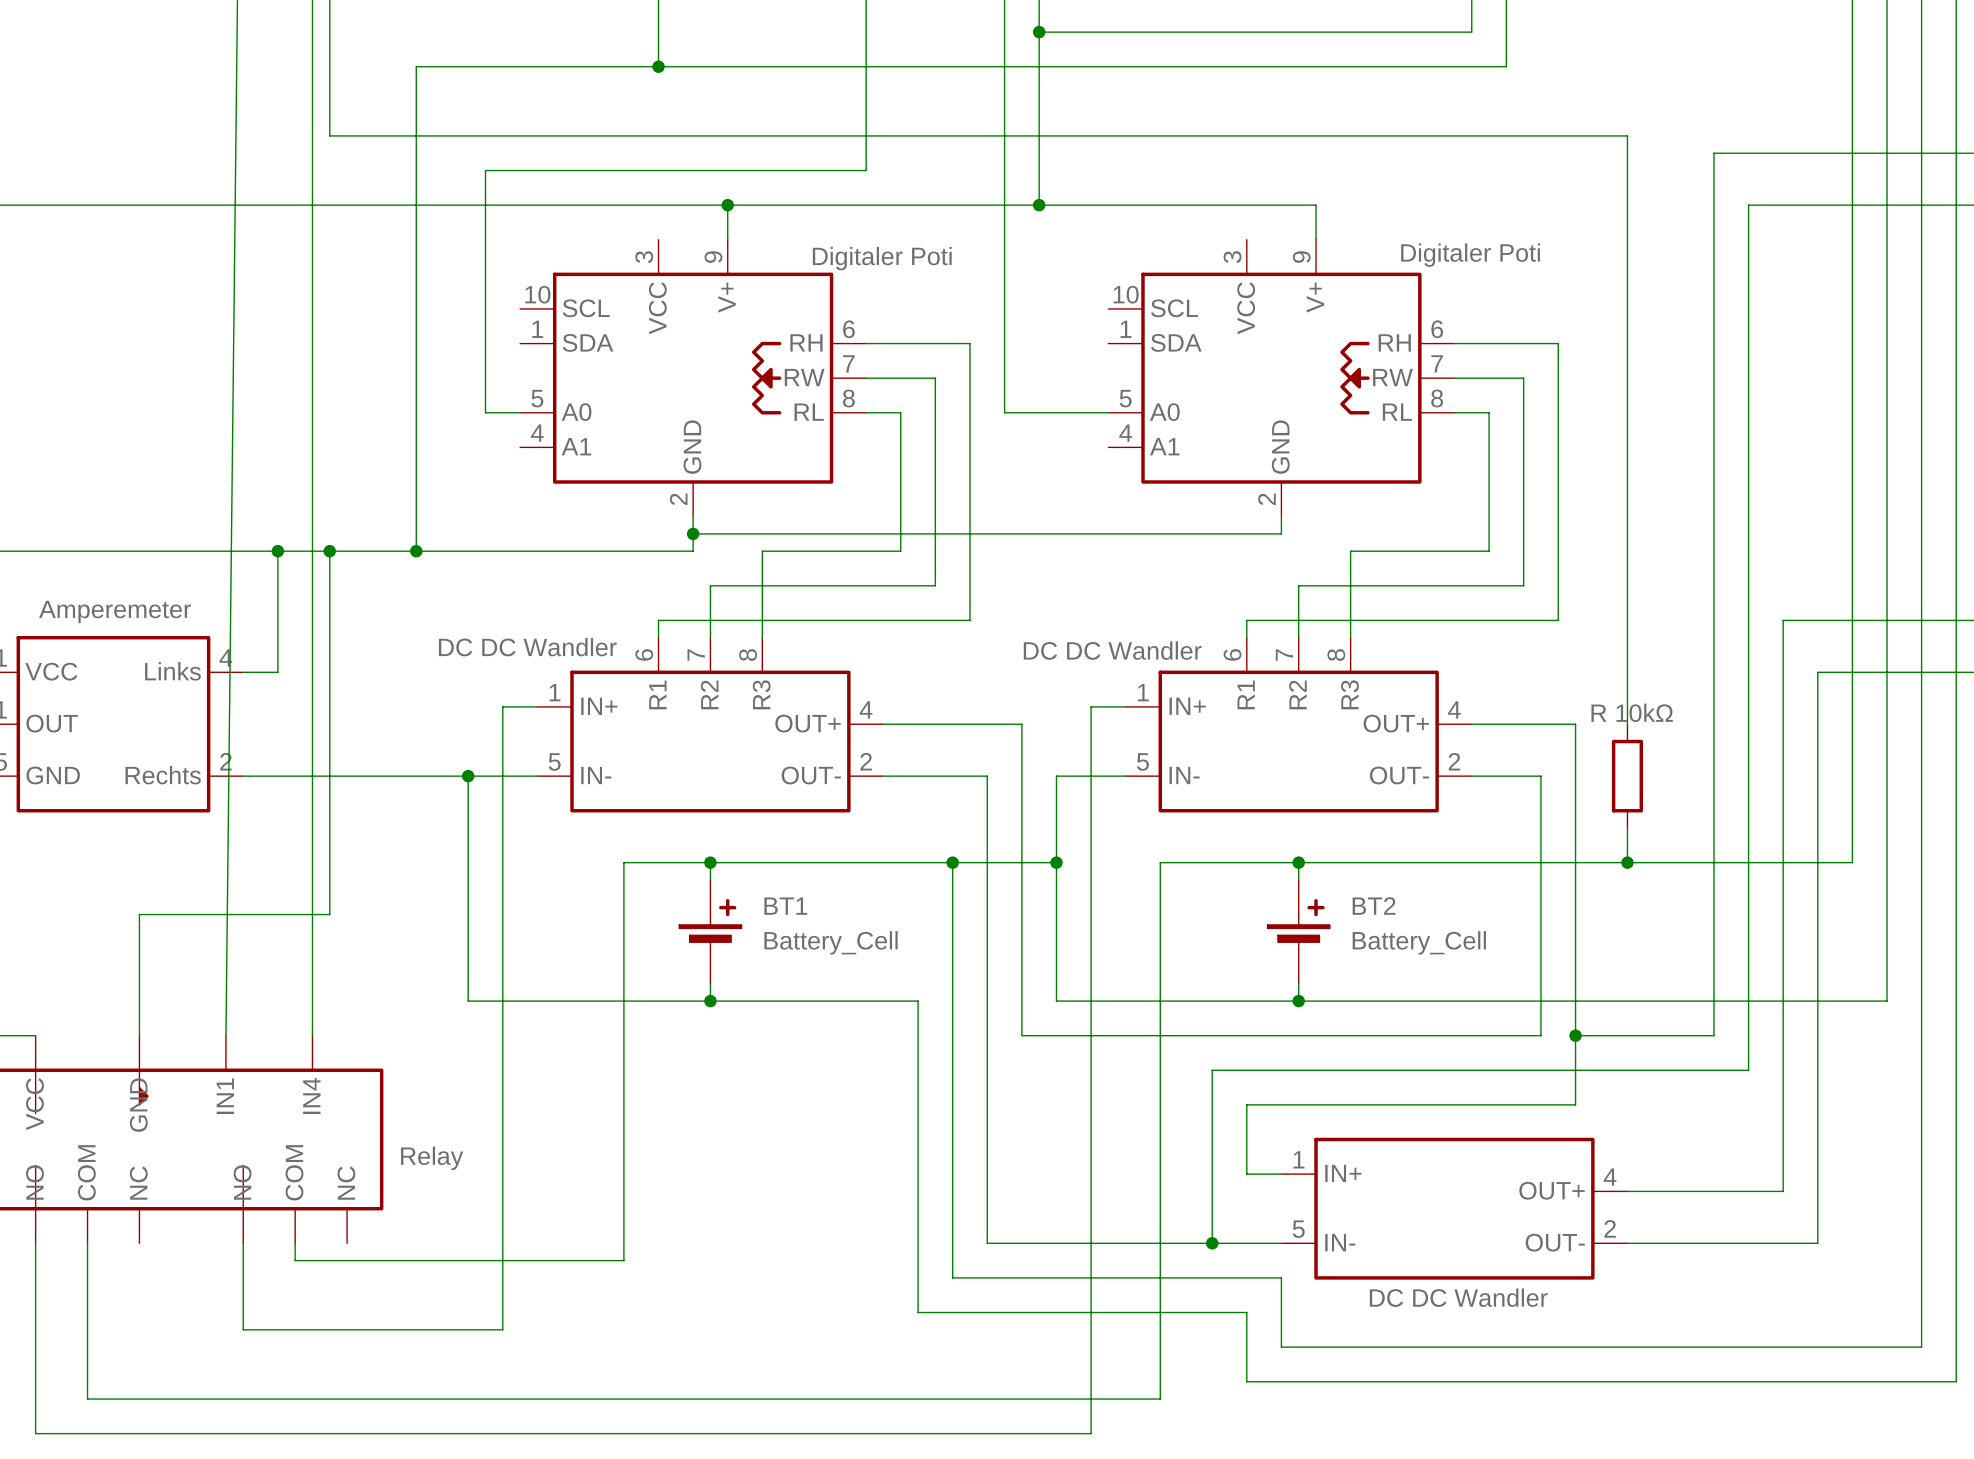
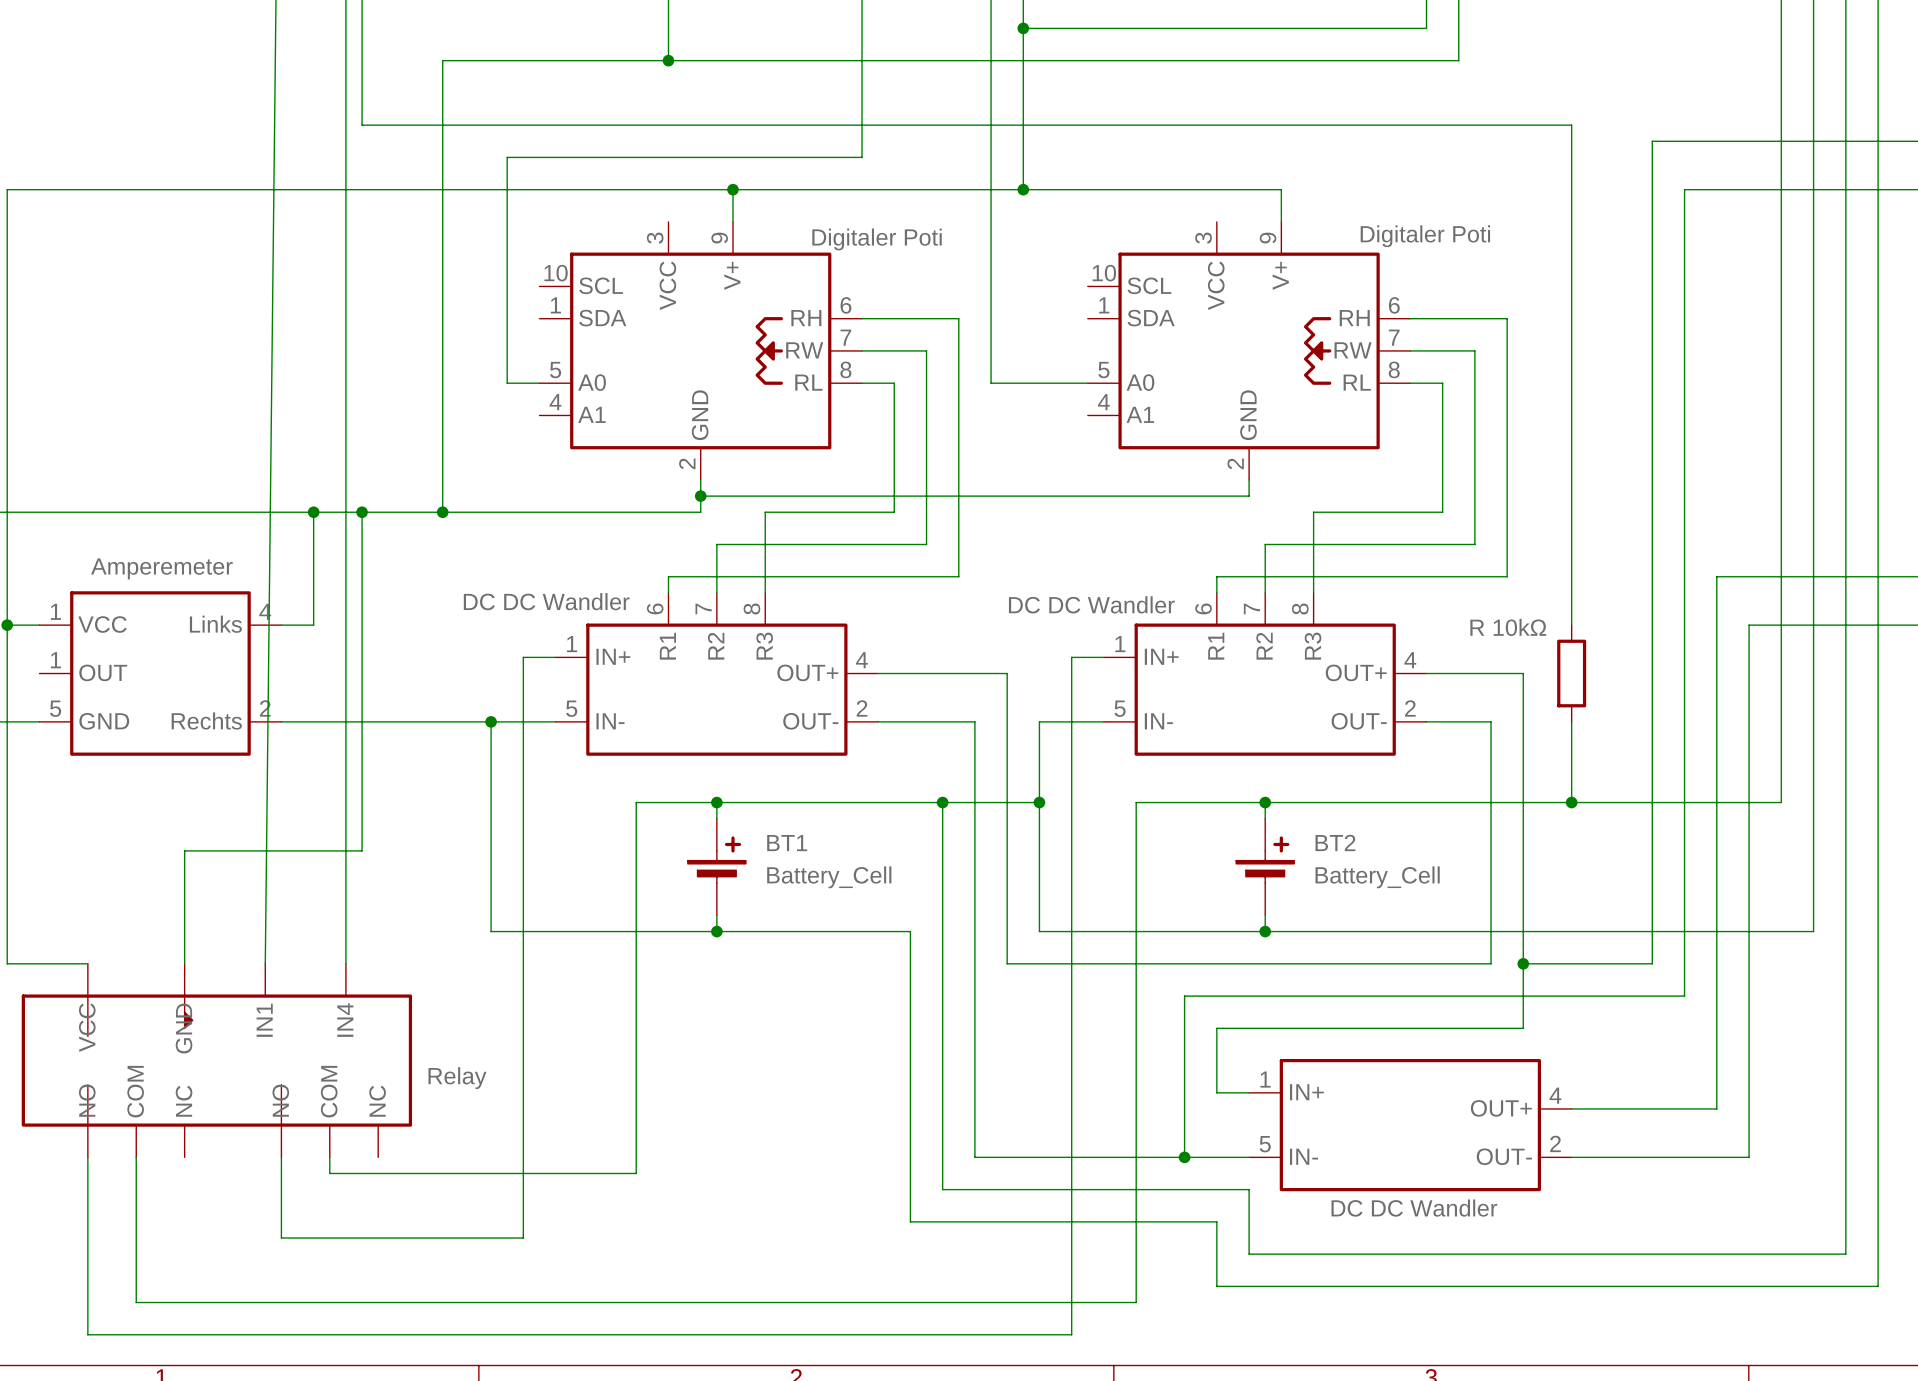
wire: (1627, 672) (1627, 724) -> (1571, 721) (1571, 770)
part value position: R 10kΩ (1632, 712) -> R 10kΩ (1508, 627)
part position: (1627, 776) -> (1571, 673)

